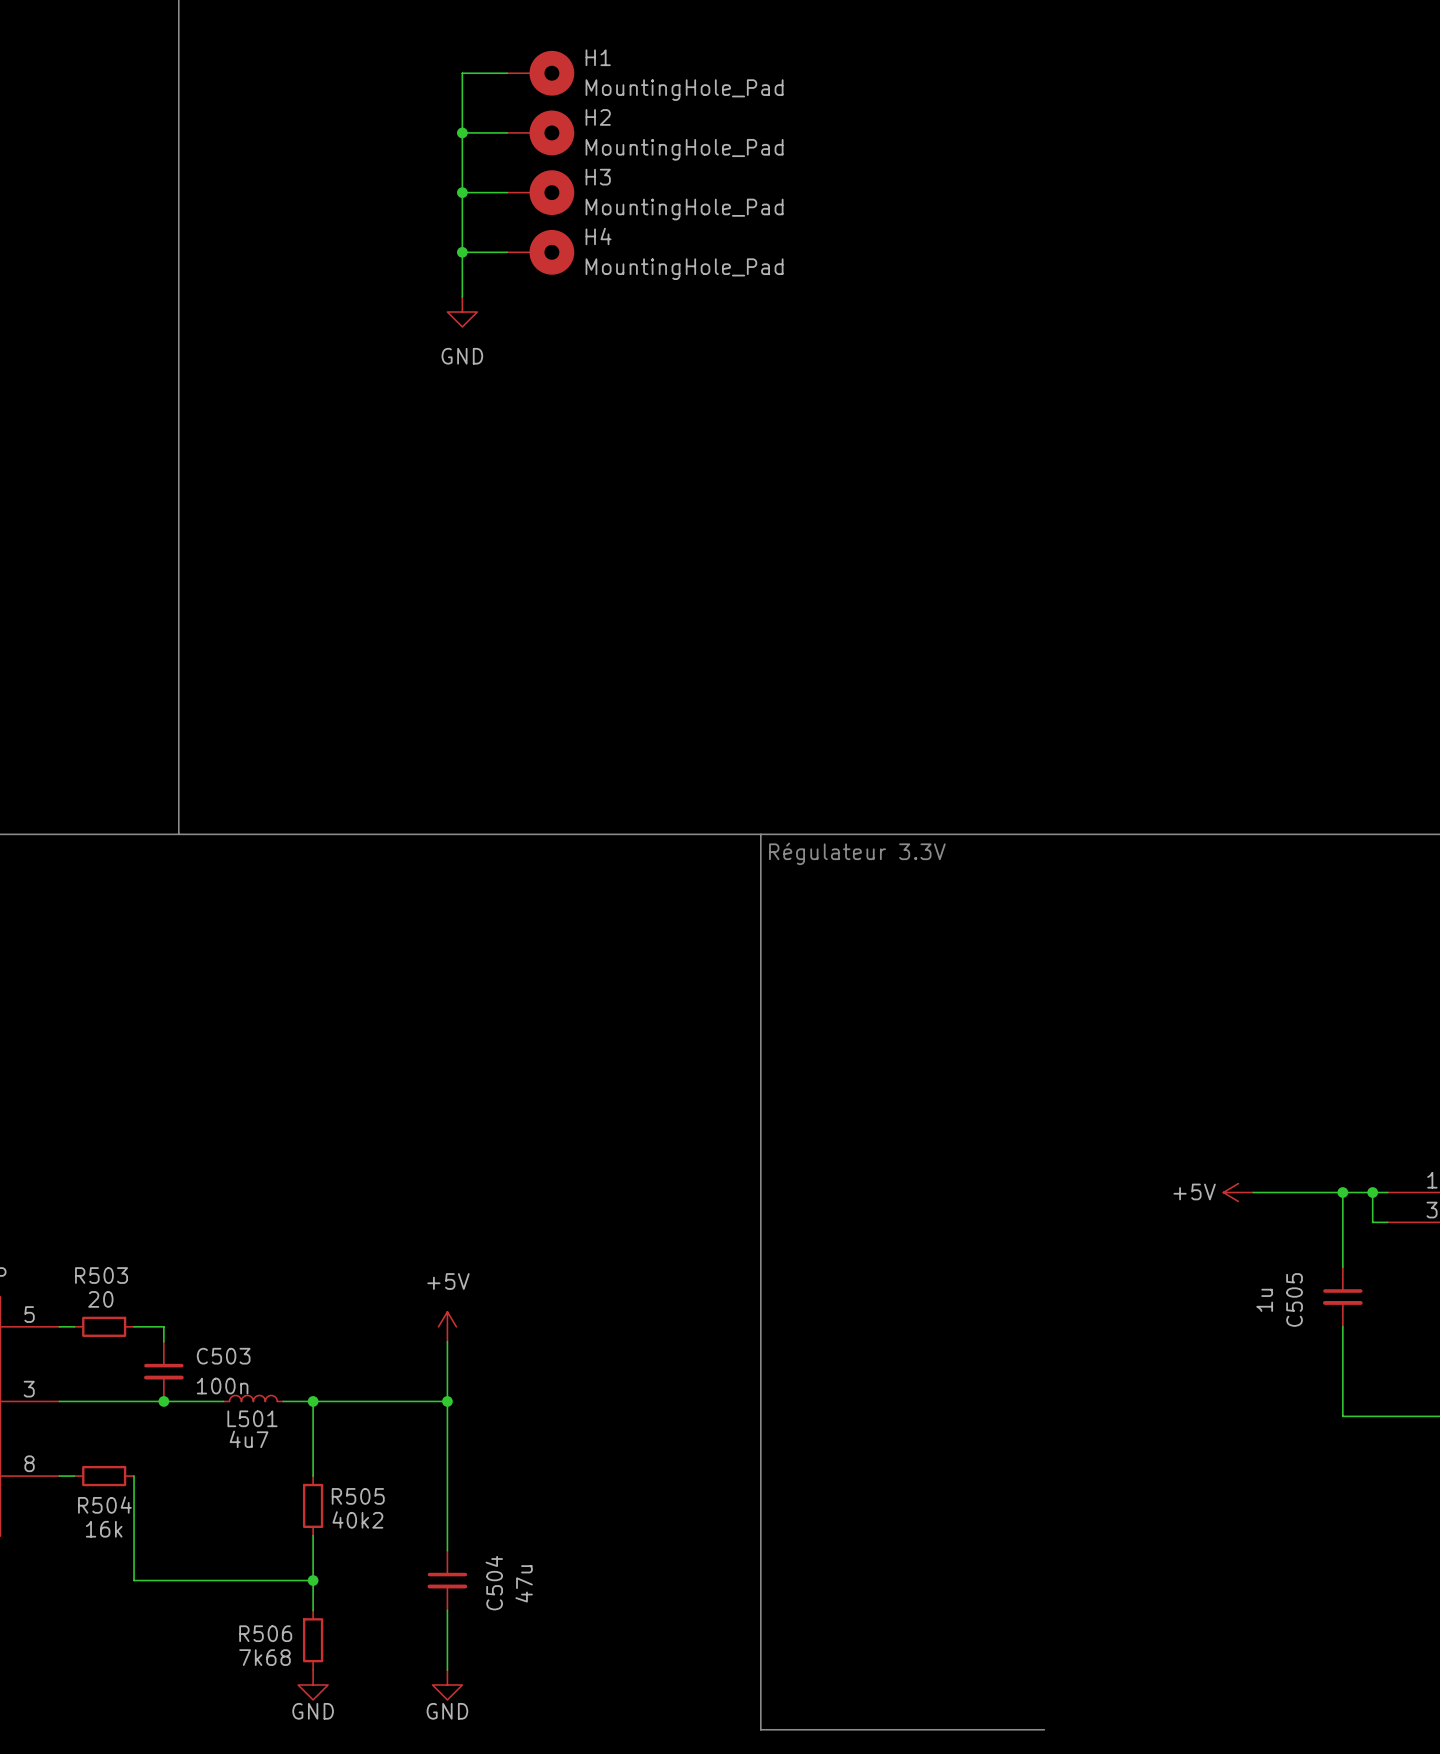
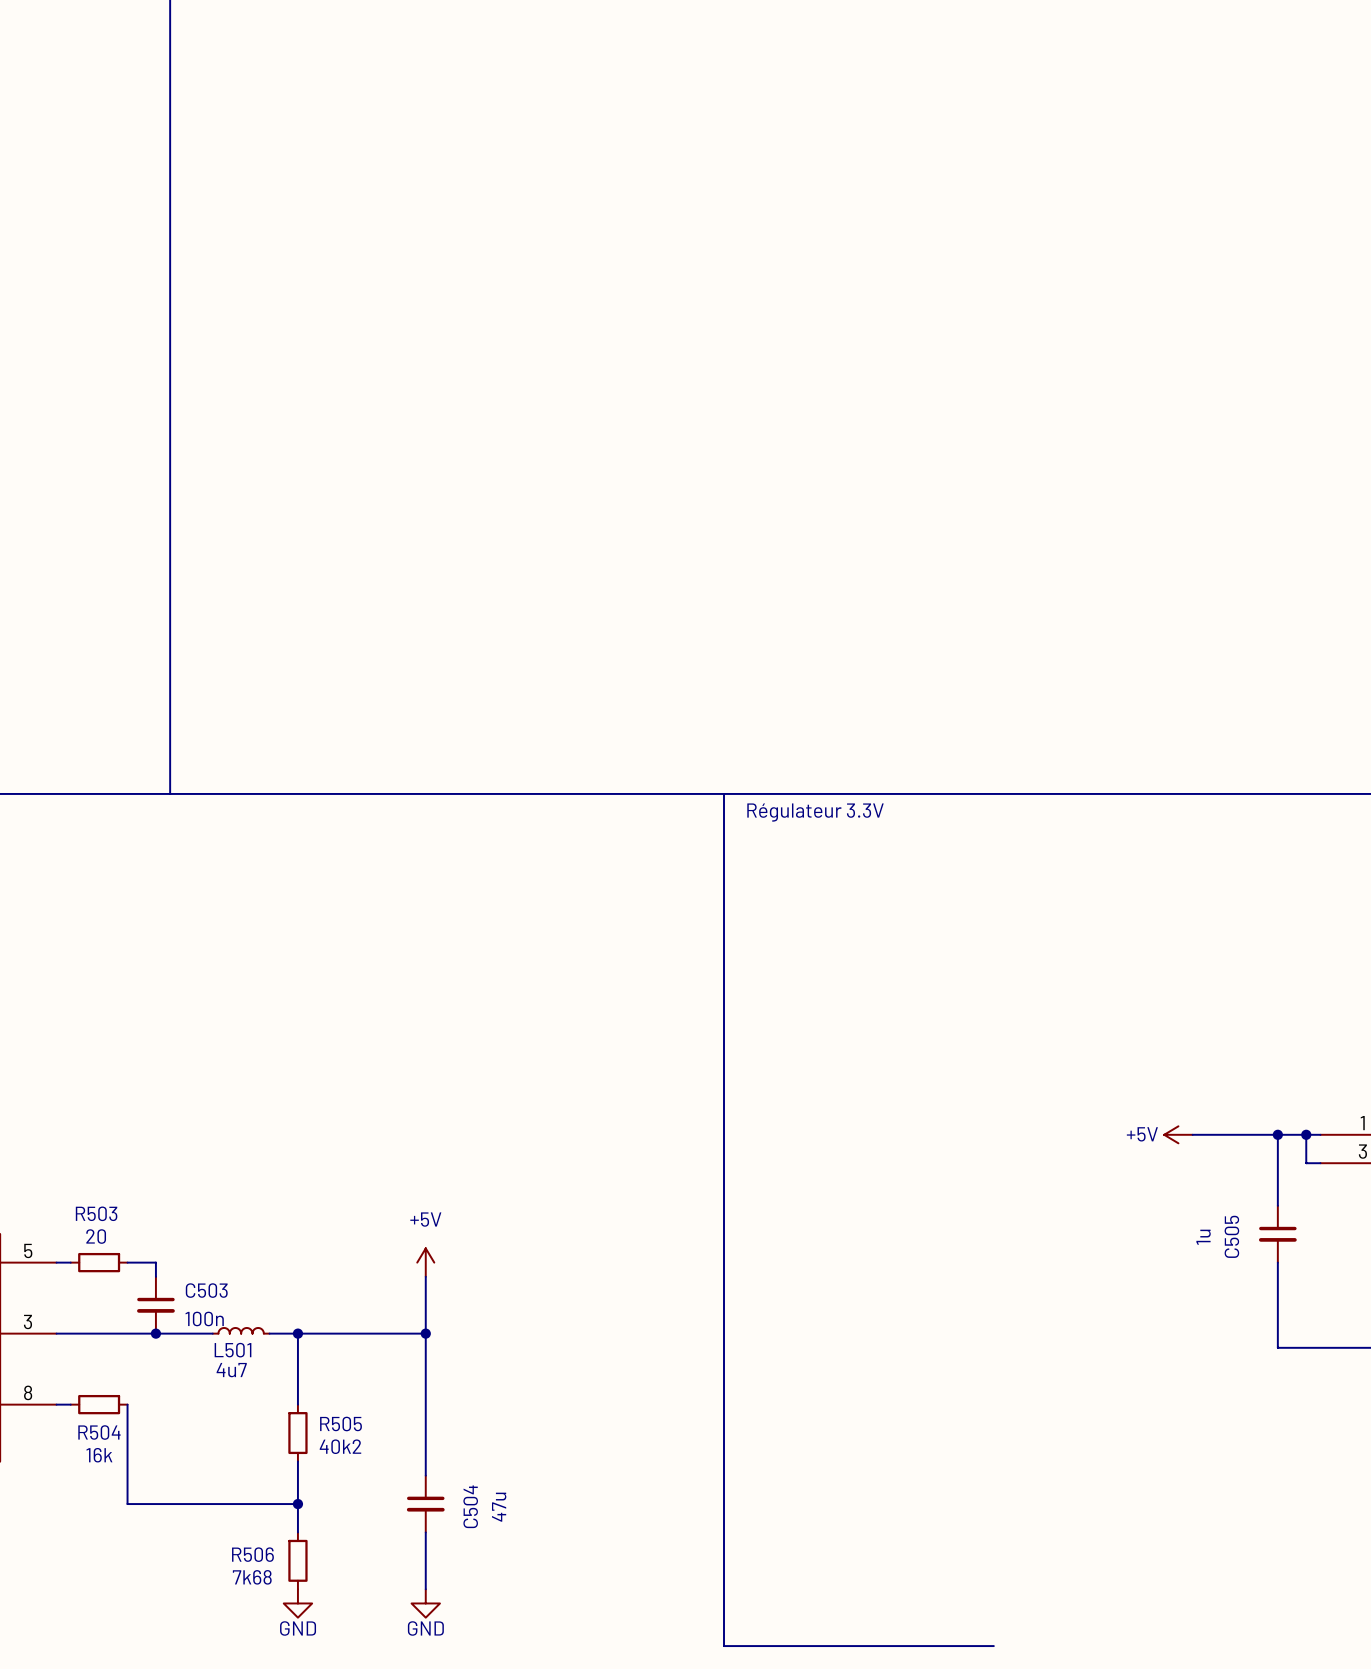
wire: (507, 73) (462, 73) (462, 297) -> none
H1: MountingHole_Pad (540, 73) -> none
wire: (462, 132) (507, 132) -> none
junction: (462, 132) -> none
H2: MountingHole_Pad (540, 132) -> none
wire: (462, 192) (507, 192) -> none
junction: (462, 192) -> none
H3: MountingHole_Pad (540, 192) -> none
wire: (462, 252) (507, 252) -> none
junction: (462, 252) -> none
H4: MountingHole_Pad (540, 252) -> none
power symbol: GND (462, 312) -> none

